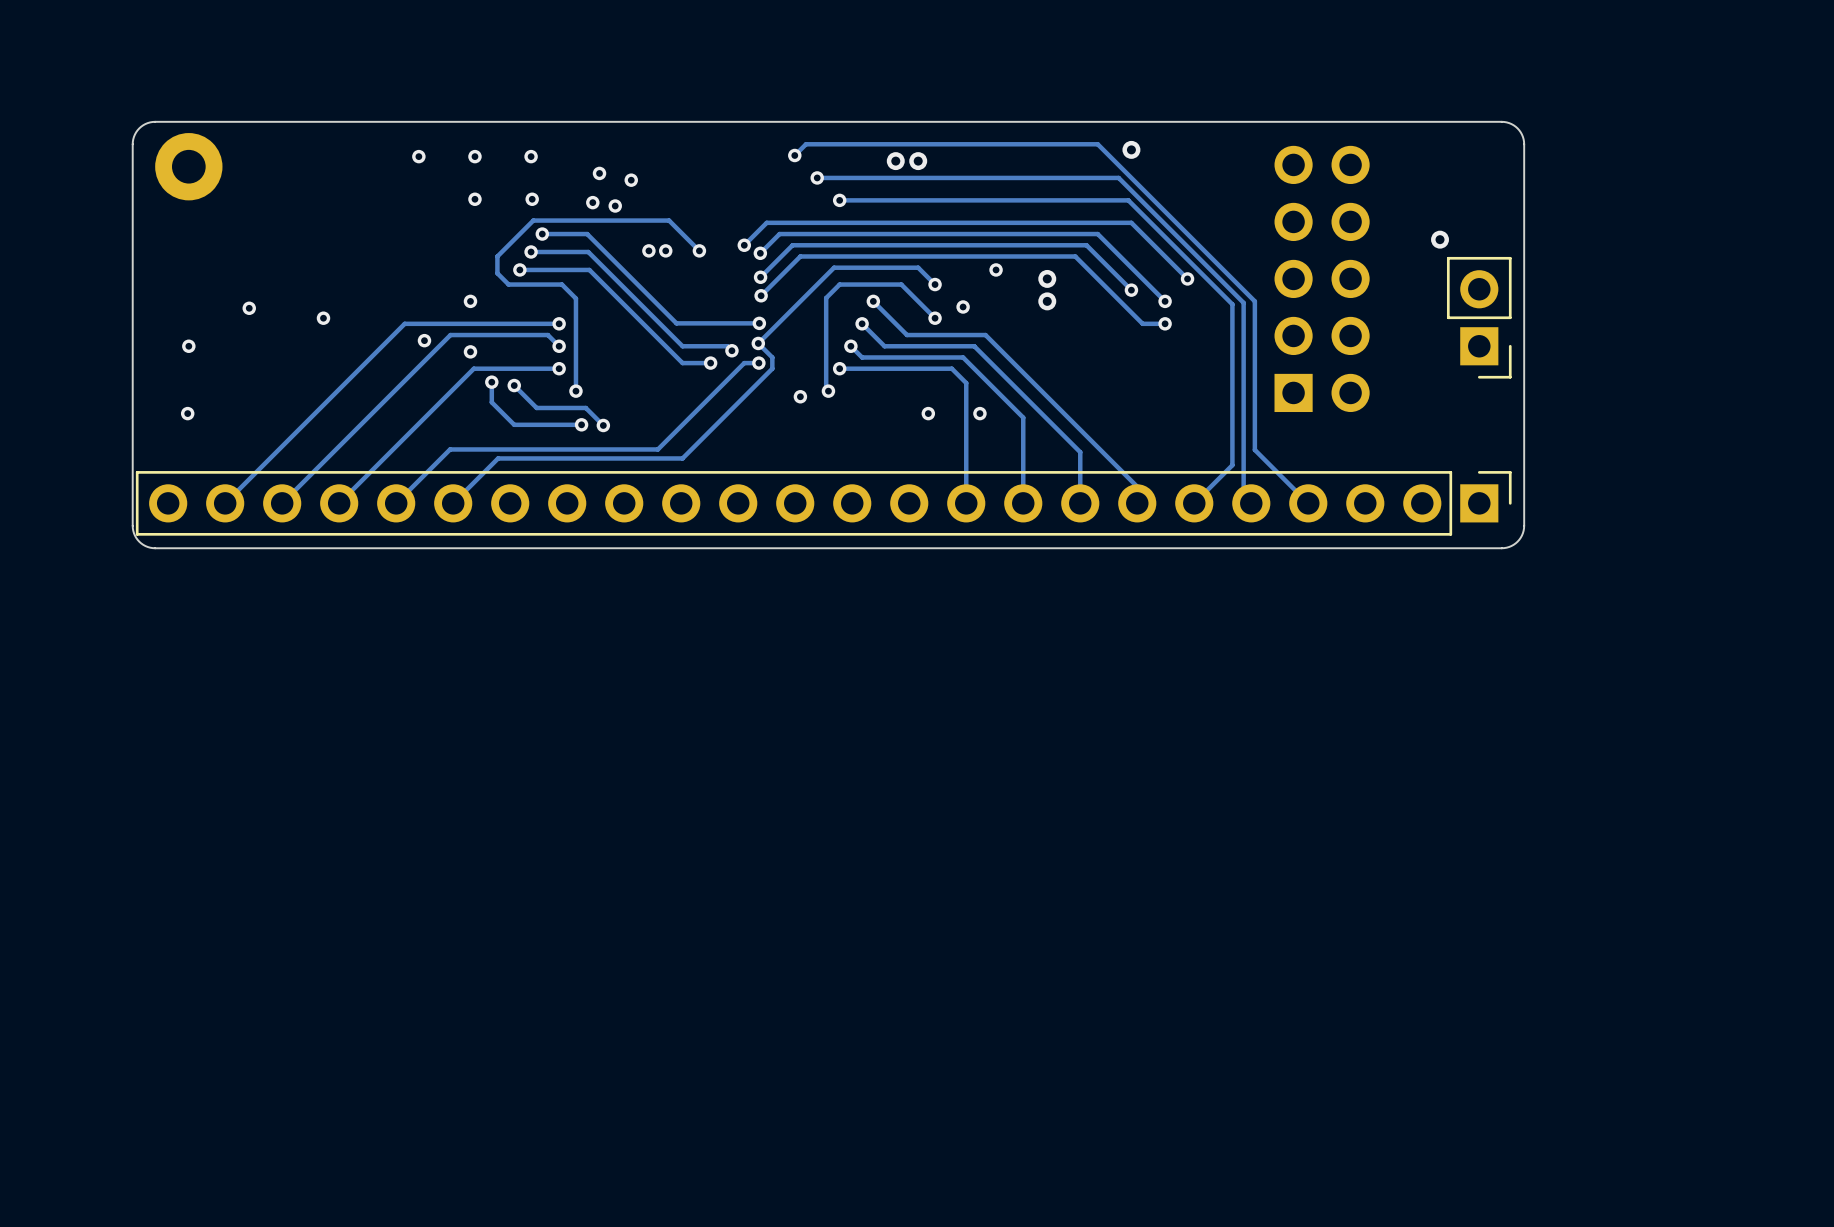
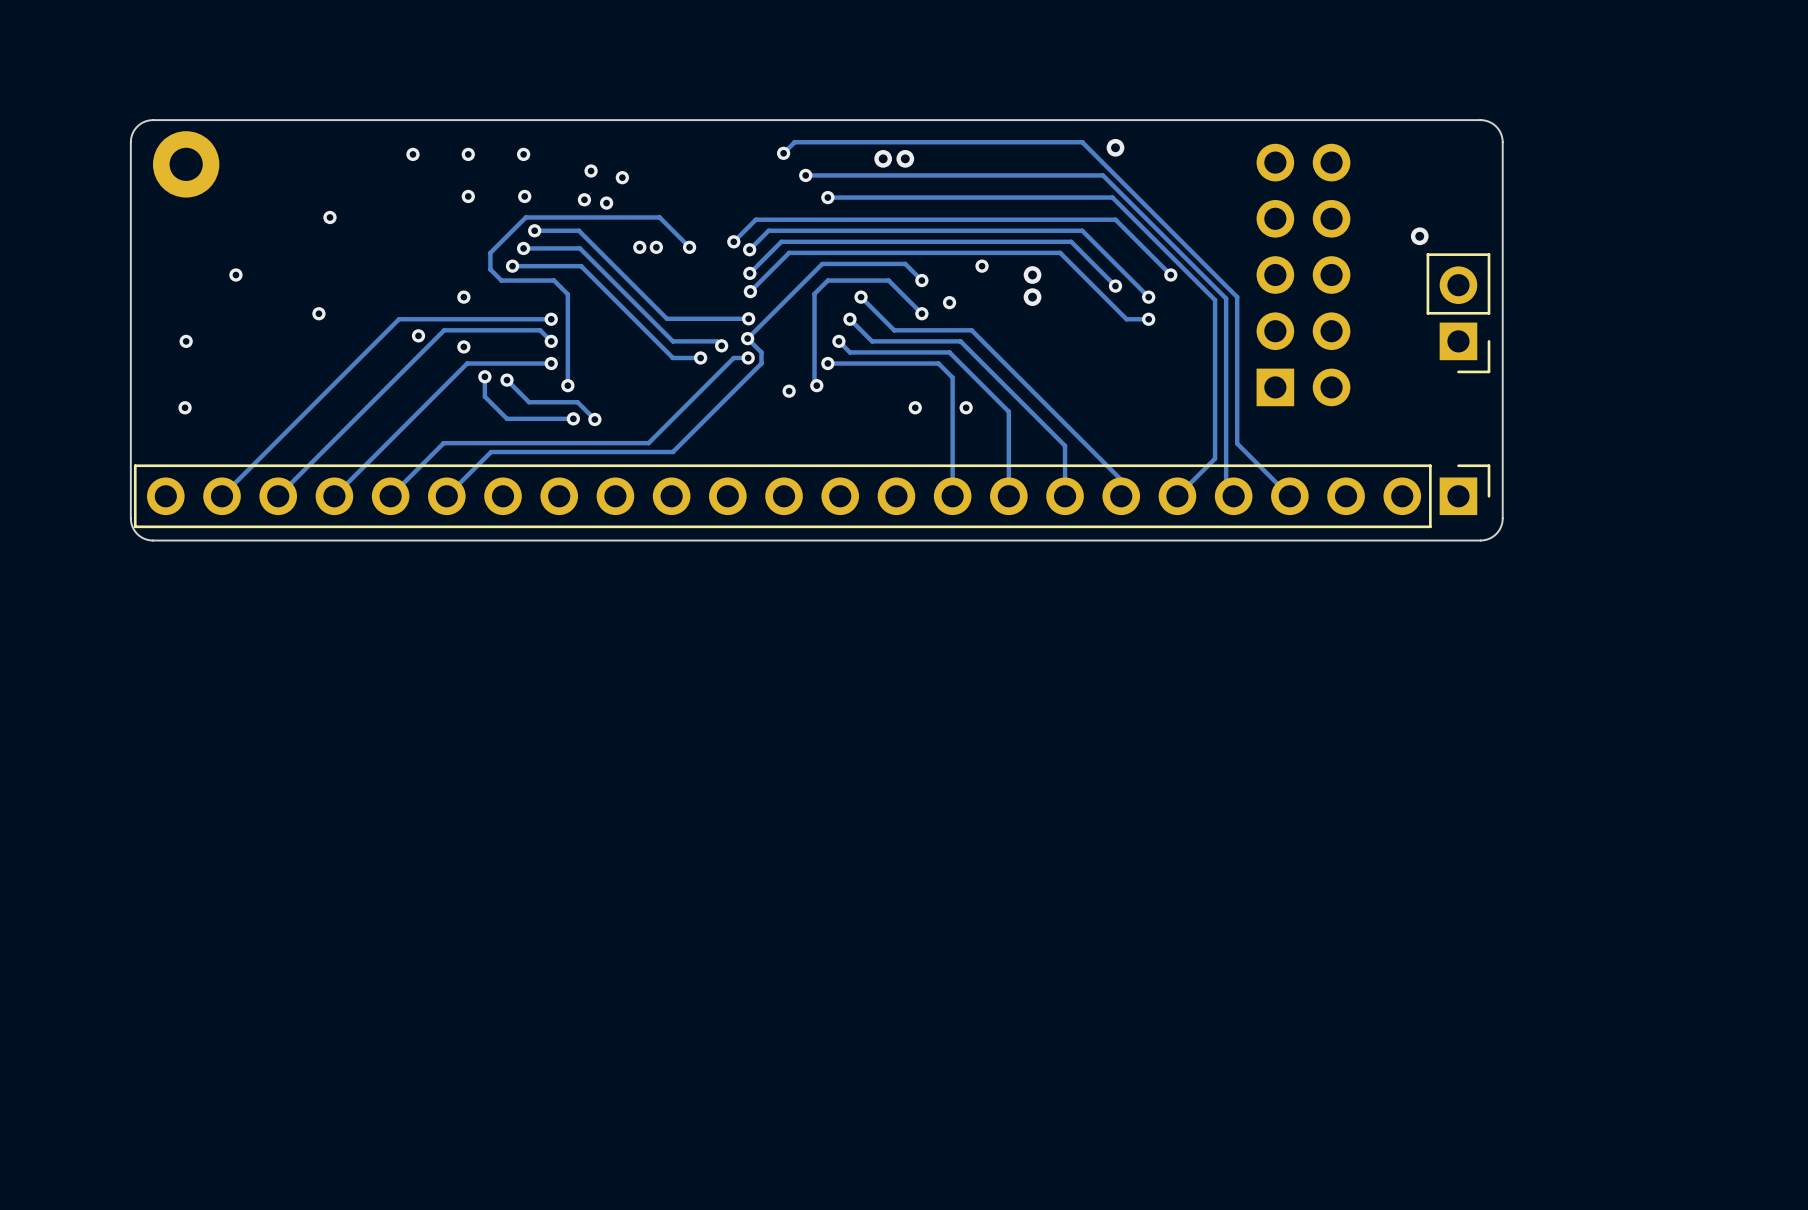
via: none -> (329, 217)
via position: (249, 308) -> (235, 275)

